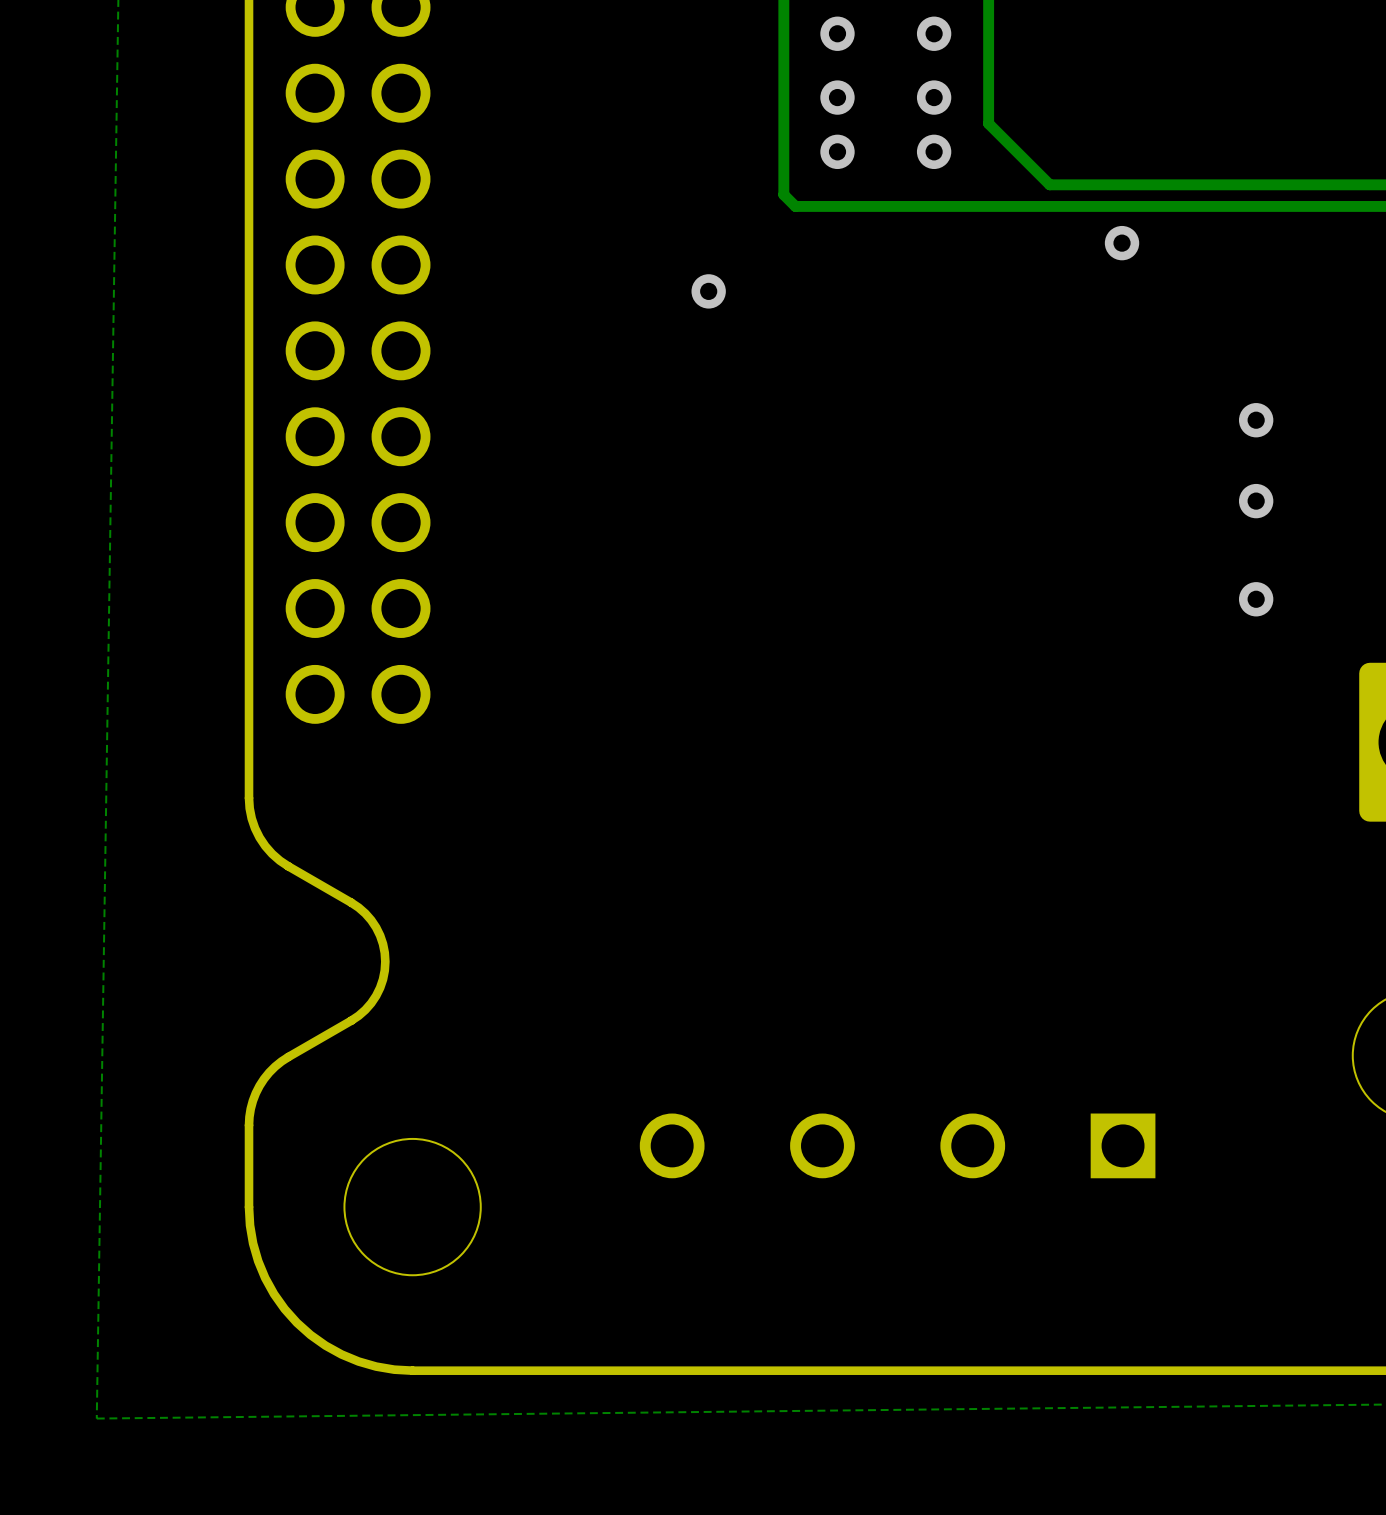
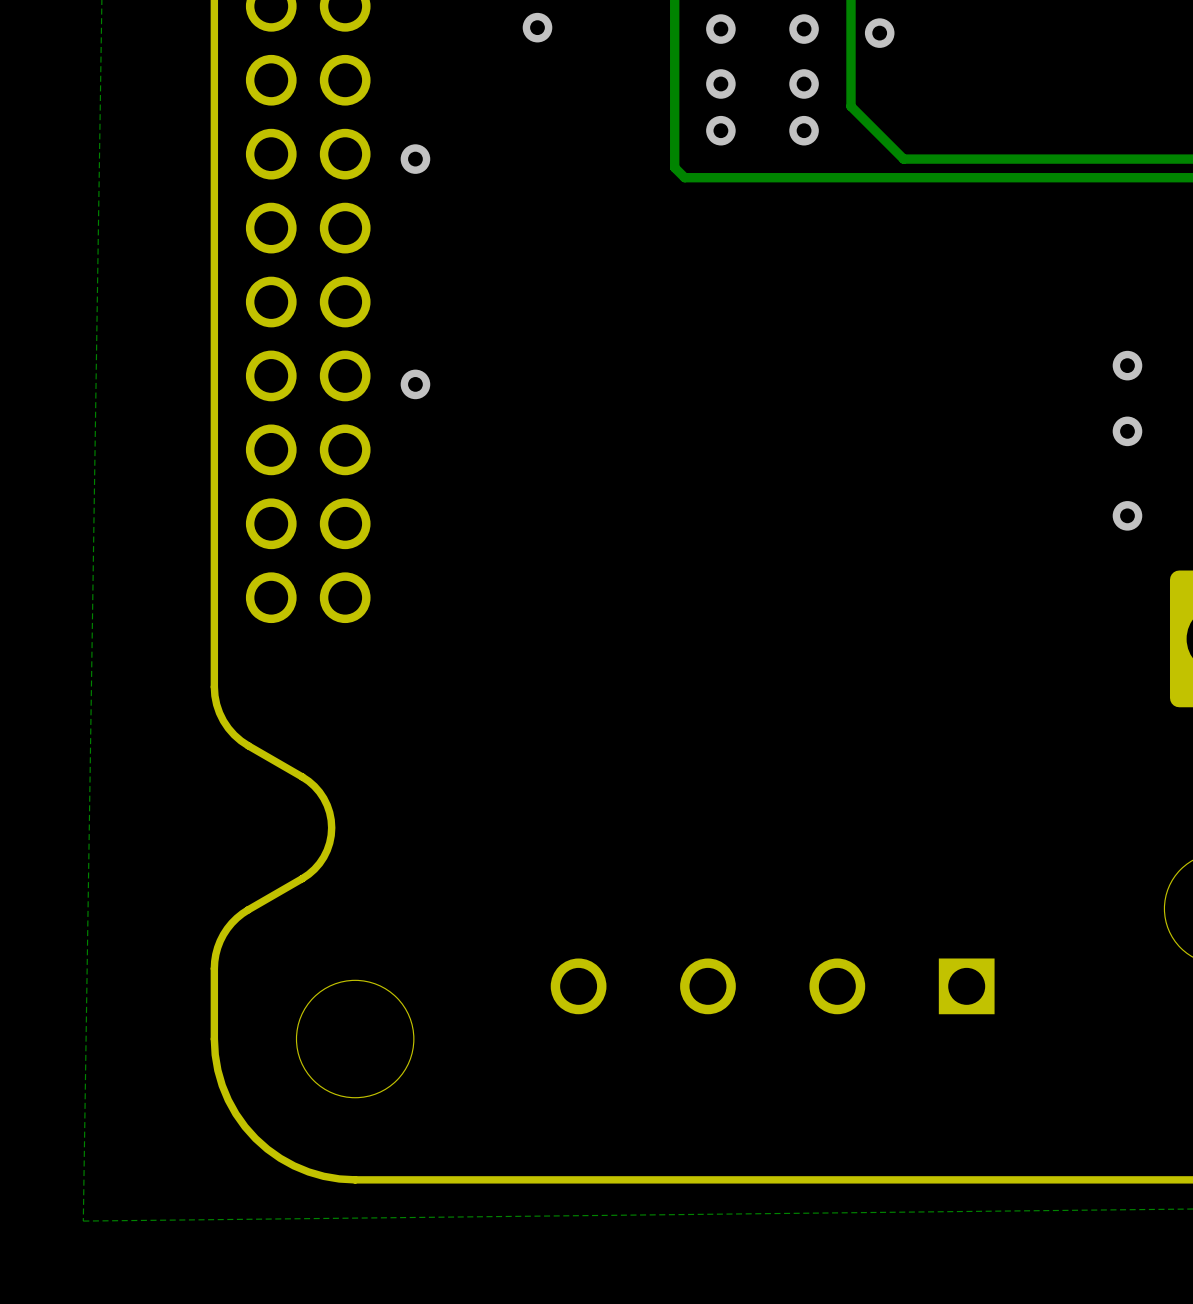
via: none -> (537, 27)
via: none -> (879, 33)
via: none -> (415, 159)
via: (1122, 243) -> none
via: (708, 291) -> none
via: (1256, 420) -> none
via: none -> (1127, 365)
via: none -> (415, 384)
via: (1256, 501) -> none
via: none -> (1127, 431)
via position: (1256, 599) -> (1127, 515)

